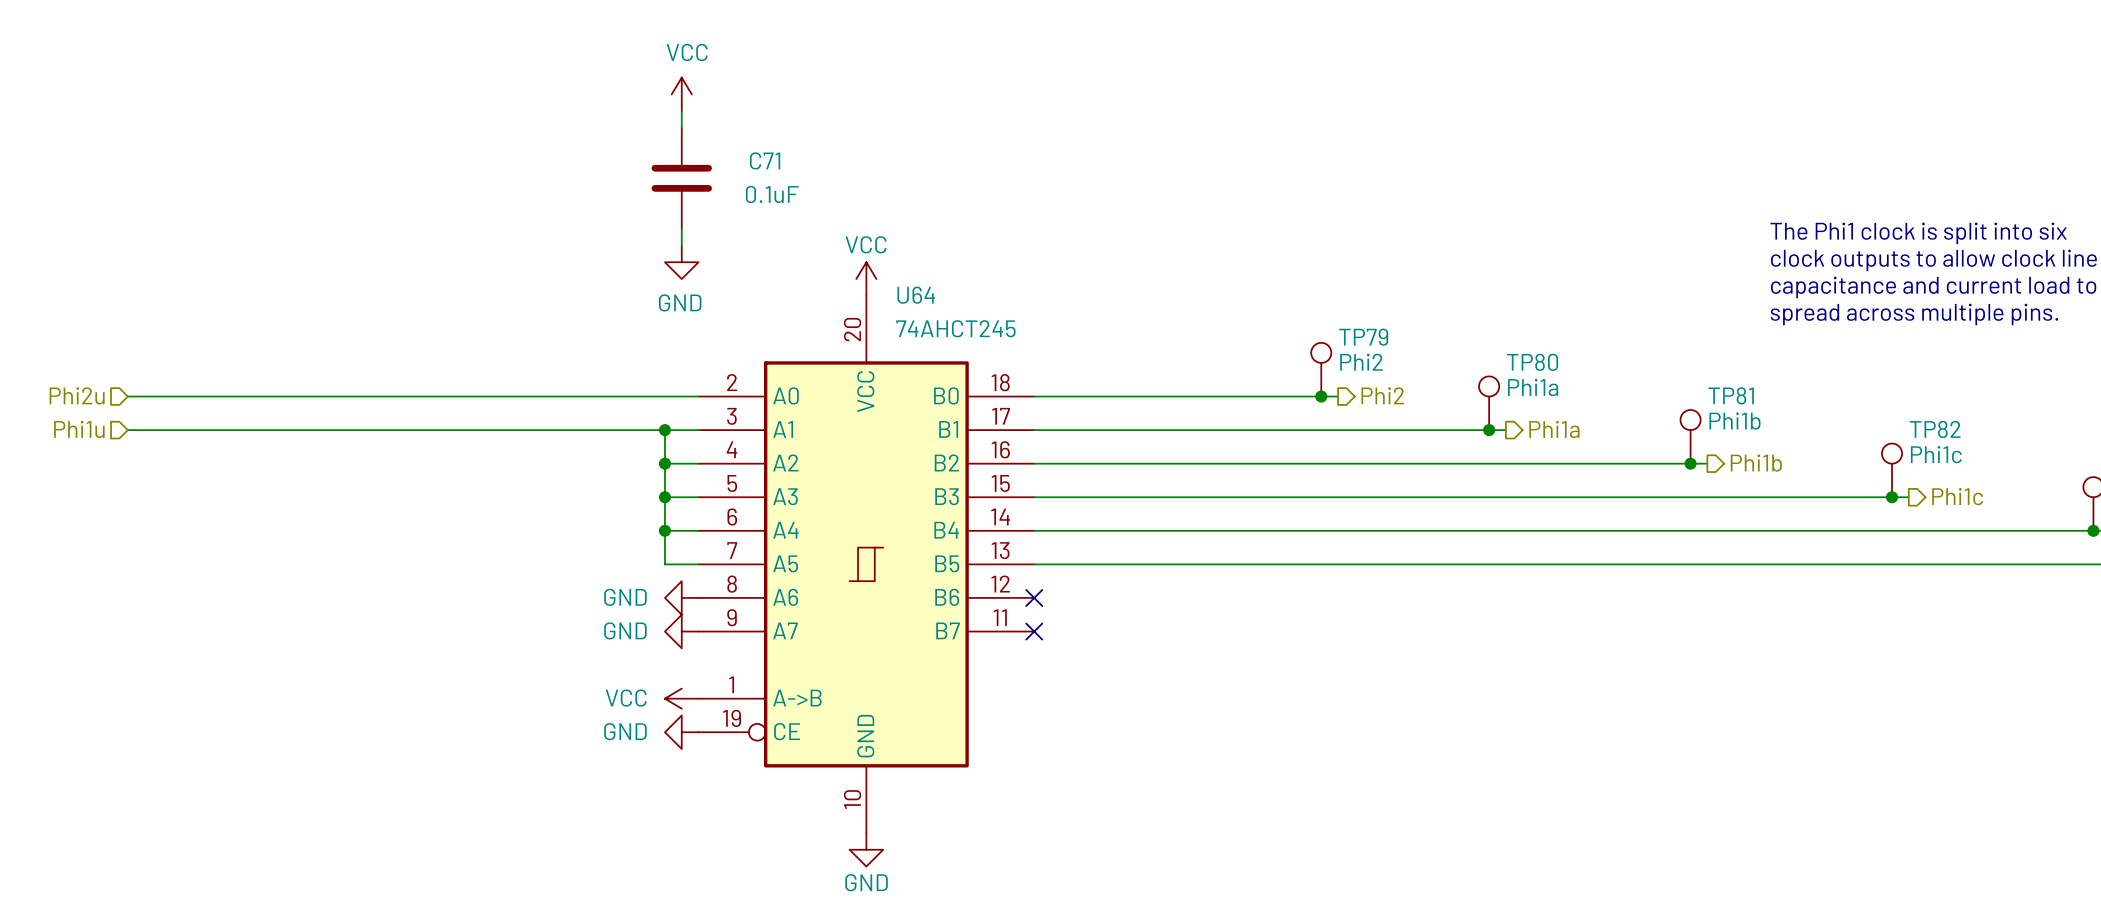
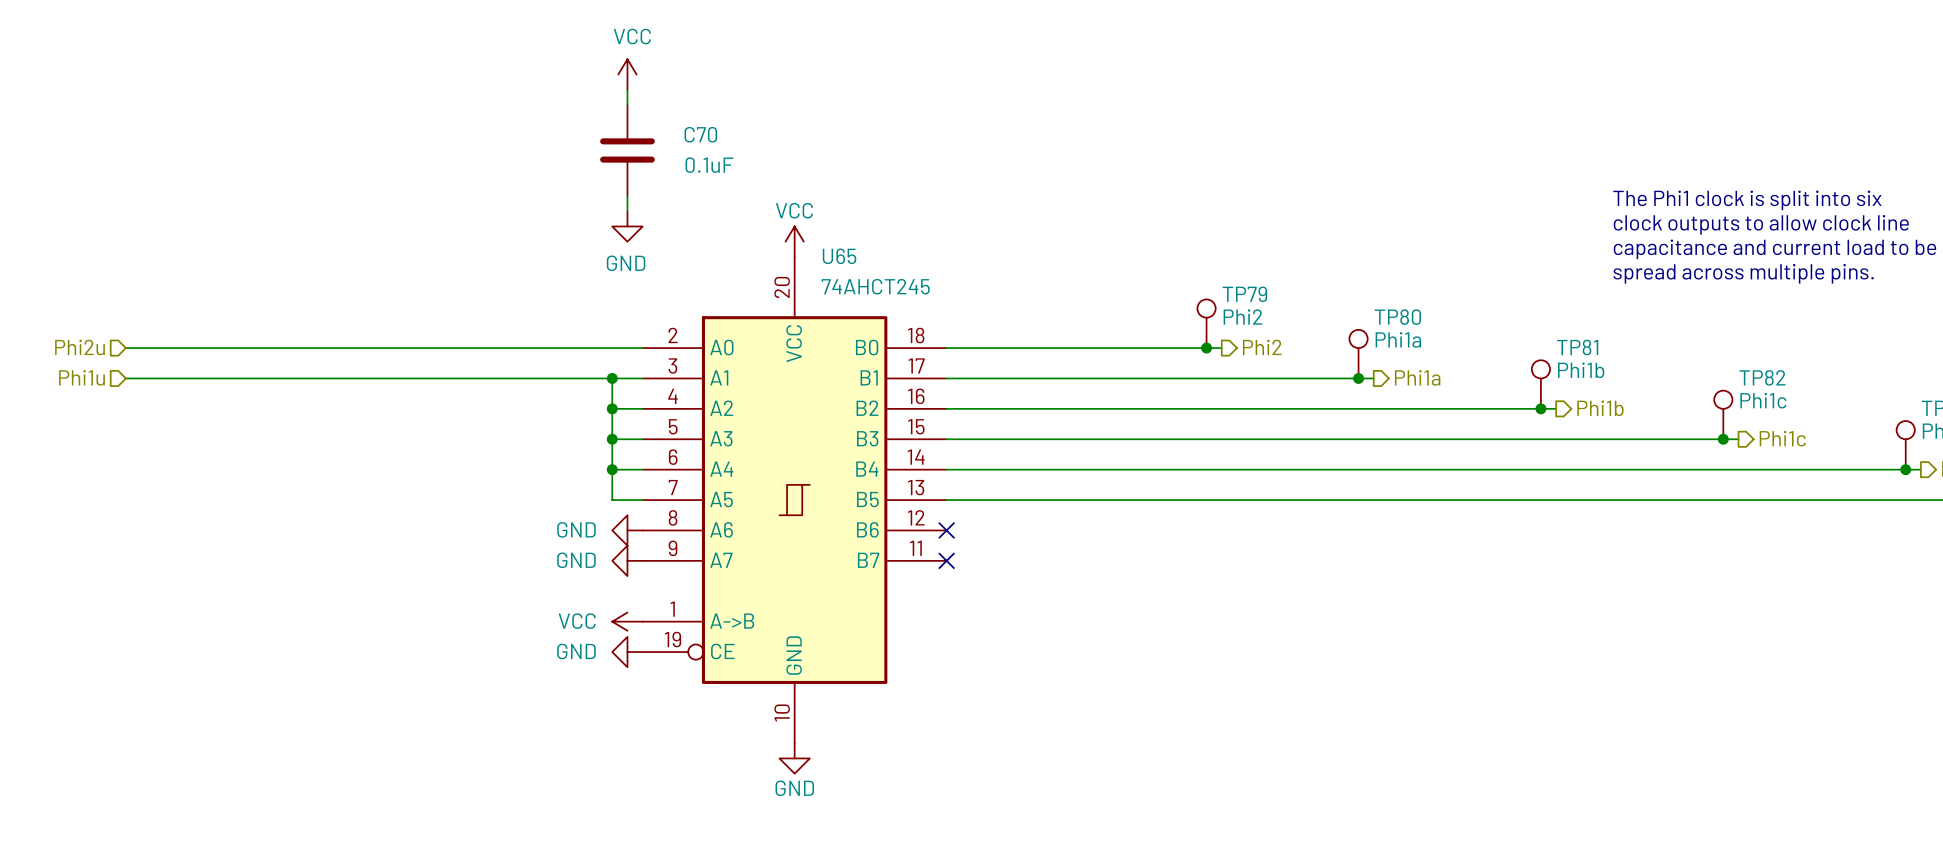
C71 name: C71 (765, 160) -> C70 (700, 134)
U64 name: U64 (916, 295) -> U65 (839, 256)

